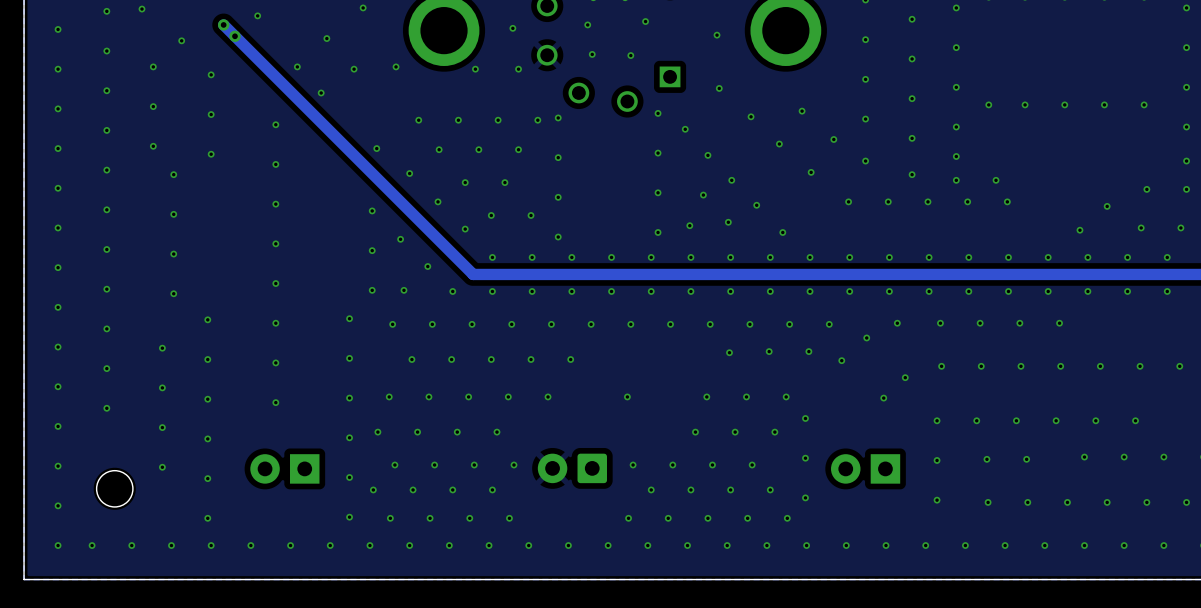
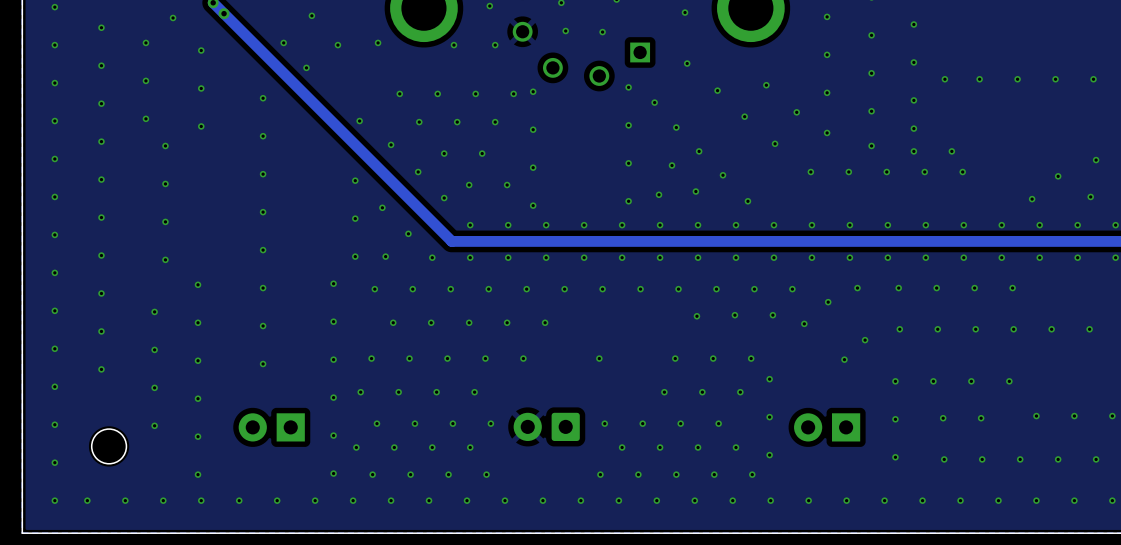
via: (1095, 420) -> none
via: (1135, 420) -> none

